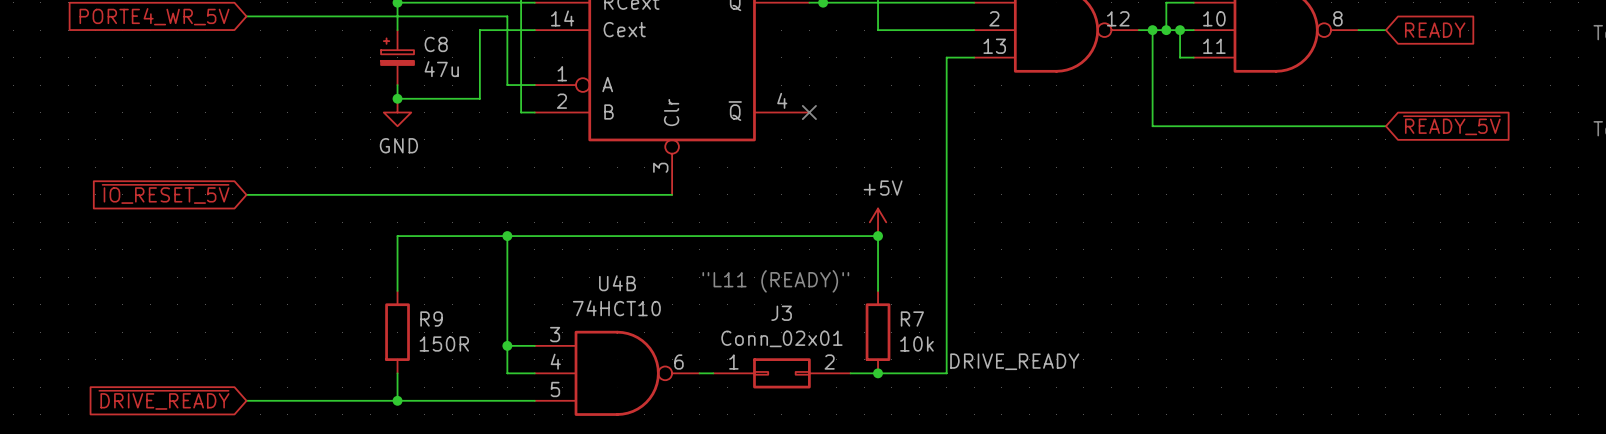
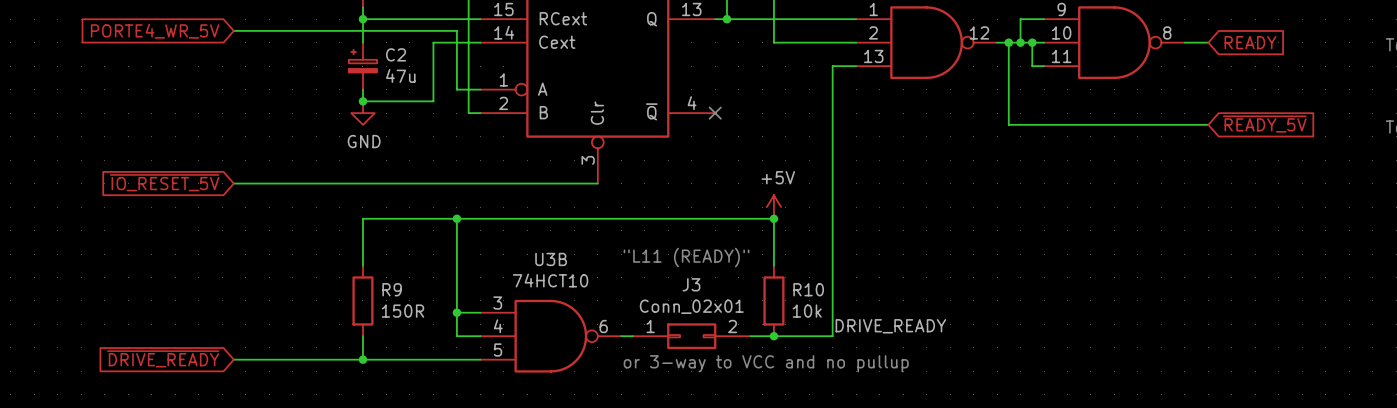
C8 name: C8 (436, 44) -> C2 (396, 54)
U4B name: U4B (617, 283) -> U3B (551, 259)
R7 name: R7 (912, 319) -> R10 (808, 289)
text: none -> or 3-way to VCC and no pullup (766, 363)

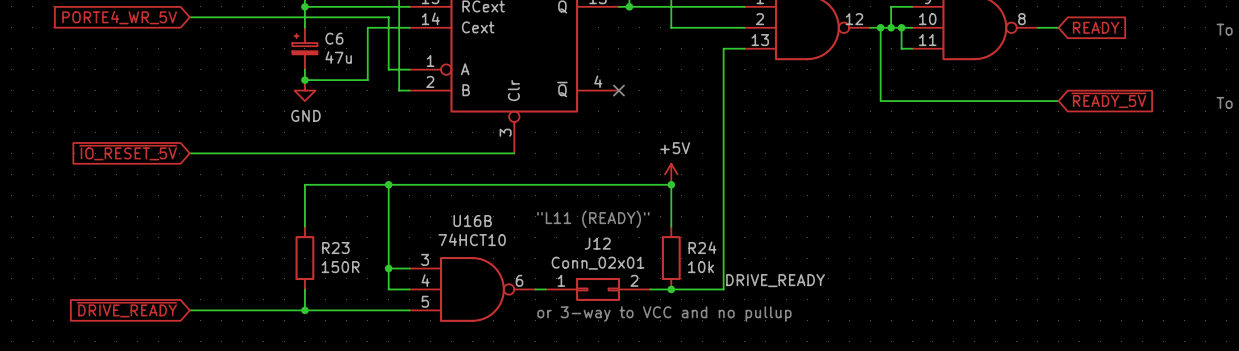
C2 name: C2 (396, 54) -> C6 (334, 38)
U3B name: U3B (551, 259) -> U16B (472, 221)
J3 name: J3 (691, 284) -> J12 (597, 243)
R9 name: R9 (392, 289) -> R23 (335, 248)
R10 name: R10 (808, 289) -> R24 (702, 247)

